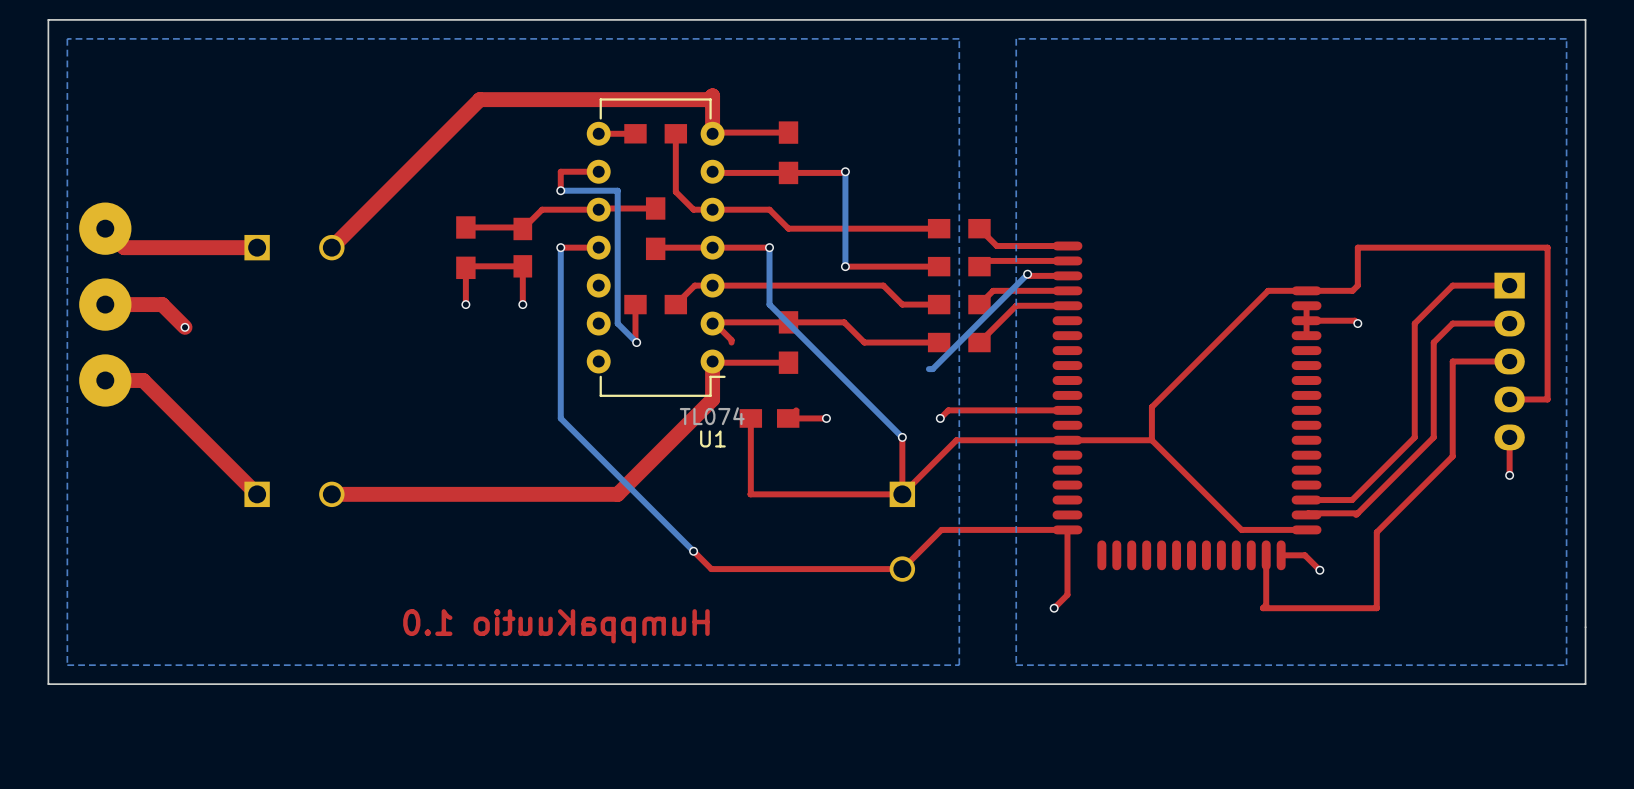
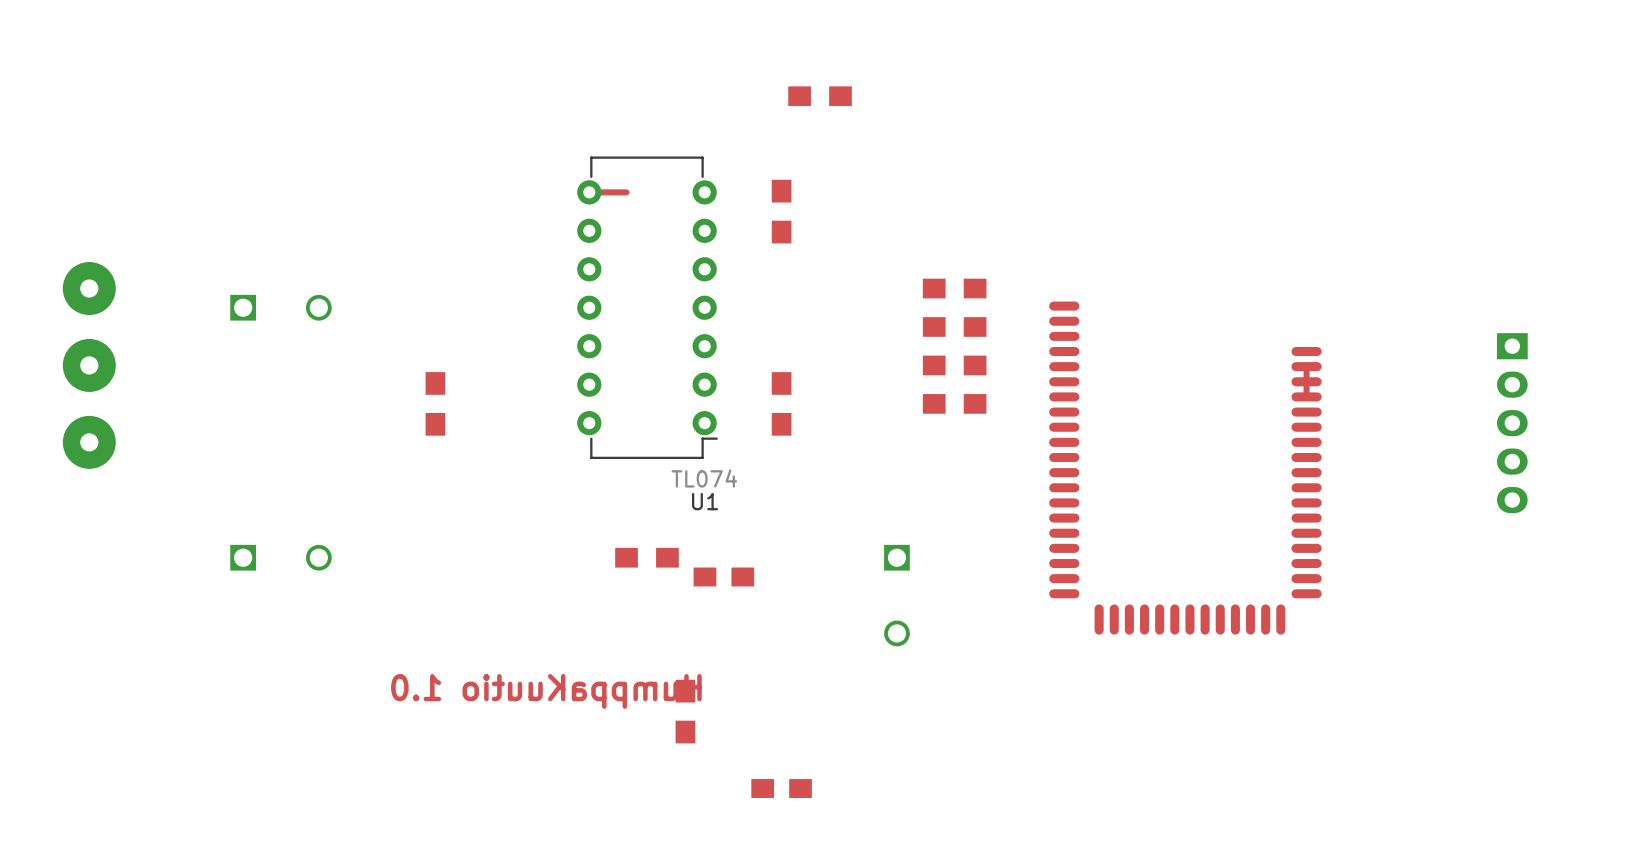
board edge: (1585, 19) (1585, 684) (48, 684) (48, 19) (1585, 19) -> none
part: none -> (820, 96)
bottom zone outline: (959, 38) (959, 665) (67, 665) (67, 38) (959, 38) -> none
bottom zone outline: (1566, 38) (1016, 38) (1016, 665) (1566, 665) (1566, 38) -> none
top track: (788, 132) (712, 133) (712, 95) (708, 99) (479, 99) (331, 247) -> none
part: (655, 133) -> none
top track: (675, 133) (675, 191) (693, 209) (769, 209) (788, 228) (939, 228) -> none
top track: (598, 171) (560, 171) (560, 190) -> none
top track: (845, 171) (712, 171) -> none
bottom track: (845, 171) (845, 266) -> none
via: (845, 171) -> none
bottom track: (560, 190) (617, 190) (617, 323) (636, 342) -> none
via: (560, 190) -> none
top track: (655, 208) (542, 209) (524, 227) (465, 227) -> none
top track: (105, 228) (124, 247) (257, 247) -> none
part: (655, 228) -> none
top track: (979, 228) (996, 246) (1067, 246) -> none
part position: (465, 247) -> (435, 403)
part: (522, 247) -> none
bottom track: (560, 247) (560, 418) (693, 551) -> none
via: (560, 247) -> none
top track: (598, 247) (560, 247) -> none
top track: (769, 247) (655, 248) -> none
bottom track: (769, 247) (769, 304) (902, 437) -> none
via: (769, 247) -> none
top track: (1067, 260) (985, 260) (979, 266) -> none
via: (845, 266) -> none
top track: (939, 266) (845, 266) -> none
top track: (1027, 274) (1029, 275) (1067, 275) -> none
bottom track: (1027, 274) (932, 369) (928, 369) -> none
via: (1027, 274) -> none
top track: (1509, 285) (1452, 285) (1414, 323) (1414, 437) (1352, 500) (1306, 500) -> none
top track: (1067, 290) (993, 290) (979, 304) -> none
top track: (105, 304) (162, 304) (185, 327) -> none
via: (465, 304) -> none
top track: (522, 304) (522, 266) (467, 266) (465, 304) -> none
via: (522, 304) -> none
top track: (635, 304) (636, 342) -> none
part: (655, 304) -> none
top track: (939, 304) (902, 304) (883, 285) (694, 285) (675, 304) -> none
top track: (1067, 305) (1016, 305) (979, 342) -> none
top track: (1306, 320) (1354, 320) (1357, 323) -> none
via: (1357, 323) -> none
top track: (1509, 323) (1452, 323) (1433, 342) (1433, 437) (1356, 514) -> none
via: (185, 327) -> none
via: (636, 342) -> none
top track: (939, 342) (864, 342) (844, 322) (713, 322) (731, 340) (731, 342) -> none
top track: (1509, 361) (1452, 361) (1452, 456) (1376, 532) (1376, 608) (1262, 608) (1266, 604) (1266, 555) -> none
top track: (788, 362) (712, 361) (712, 399) (617, 494) (331, 494) -> none
top track: (105, 380) (143, 380) (257, 494) -> none
top track: (1509, 399) (1547, 399) (1547, 247) (1357, 247) (1357, 285) (1352, 290) (1268, 290) (1151, 407) (1151, 440) -> none
top track: (796, 410) (788, 418) (826, 418) -> none
top track: (1067, 410) (948, 410) (940, 418) -> none
top track: (750, 418) (750, 494) (902, 494) -> none
part position: (769, 418) -> (723, 576)
via: (826, 418) -> none
via: (940, 418) -> none
top track: (902, 437) (902, 494) -> none
via: (902, 437) -> none
top track: (1509, 437) (1509, 475) -> none
top track: (1151, 440) (956, 440) (902, 494) -> none
top track: (1151, 440) (1241, 529) (1306, 529) -> none
via: (1509, 475) -> none
part: none -> (646, 557)
top track: (1357, 513) (1308, 513) (1306, 514) -> none
top track: (693, 551) (711, 569) (902, 569) (941, 529) (1067, 529) (1067, 594) (1054, 608) -> none
via: (693, 551) -> none
top track: (1281, 551) (1281, 555) (1304, 555) (1319, 570) -> none
via: (1319, 570) -> none
via: (1054, 608) -> none
part: none -> (685, 711)
part: none -> (781, 788)

